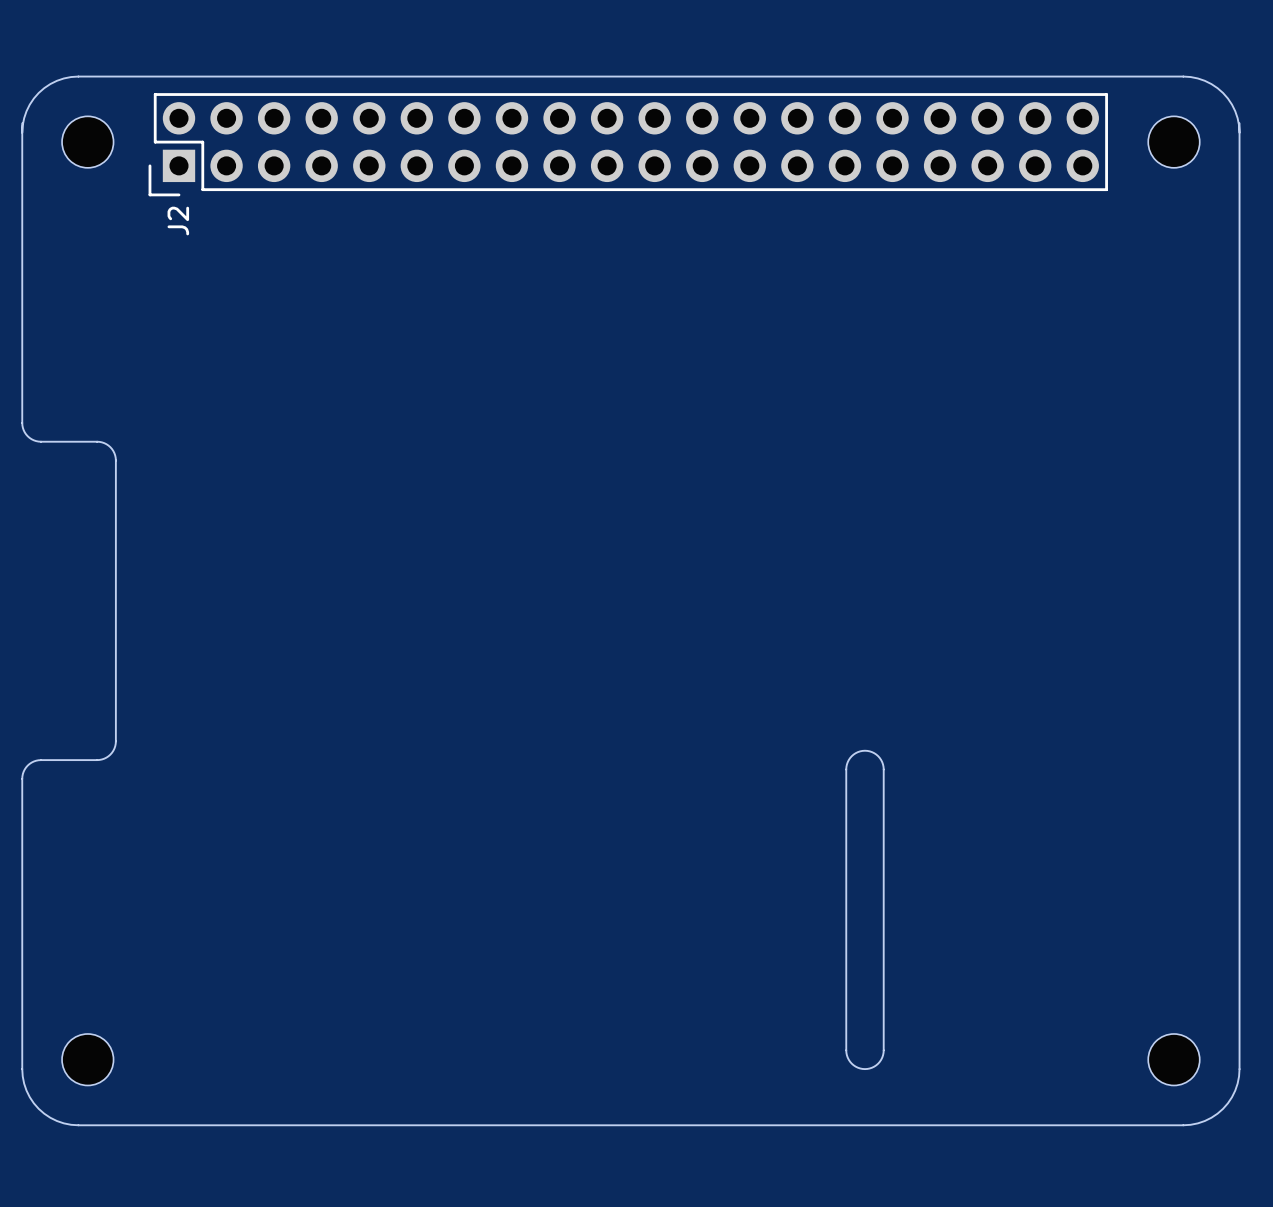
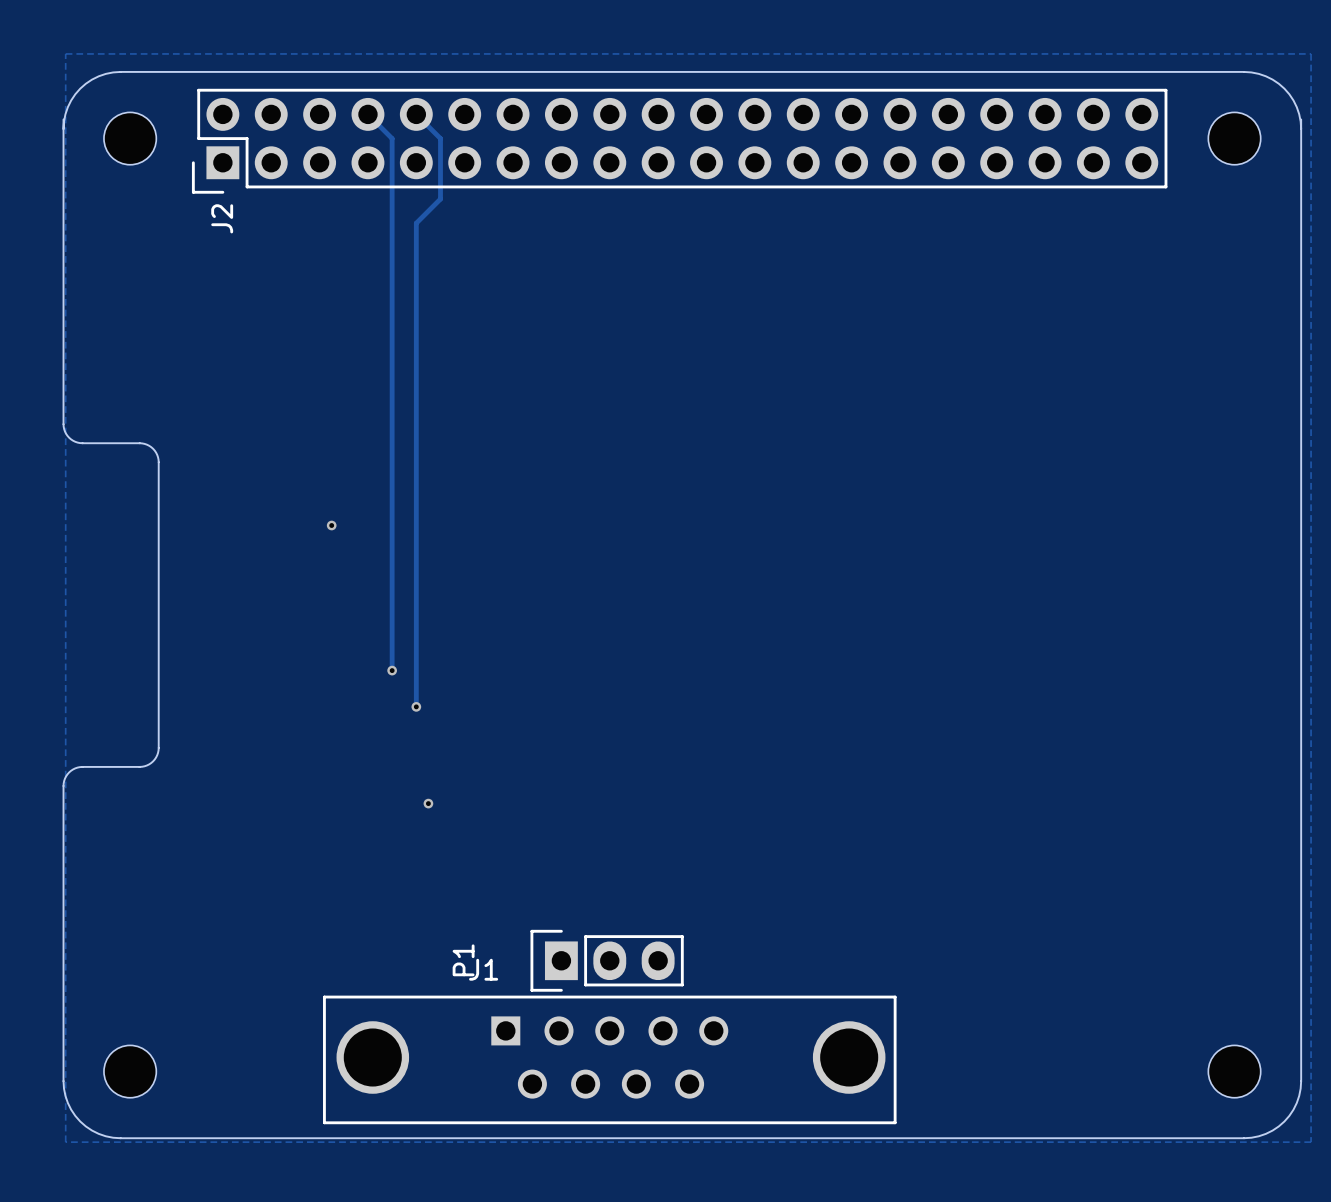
zone outline: none -> (65, 53) (1311, 53) (1311, 1142) (65, 1142) (65, 53)
track: none -> (367, 114) (392, 138) (392, 670)
track: none -> (416, 114) (440, 138) (440, 199) (416, 223) (416, 706)
via: none -> (331, 525)
via: none -> (392, 670)
via: none -> (416, 706)
board edge: (846, 769) (846, 1052) (853, 1065) (867, 1068) (879, 1061) (883, 1050) (883, 767) (878, 756) (864, 750) (851, 756) (846, 769) -> none
via: none -> (428, 803)
P1: none -> (607, 960)
J1: none -> (609, 1059)

